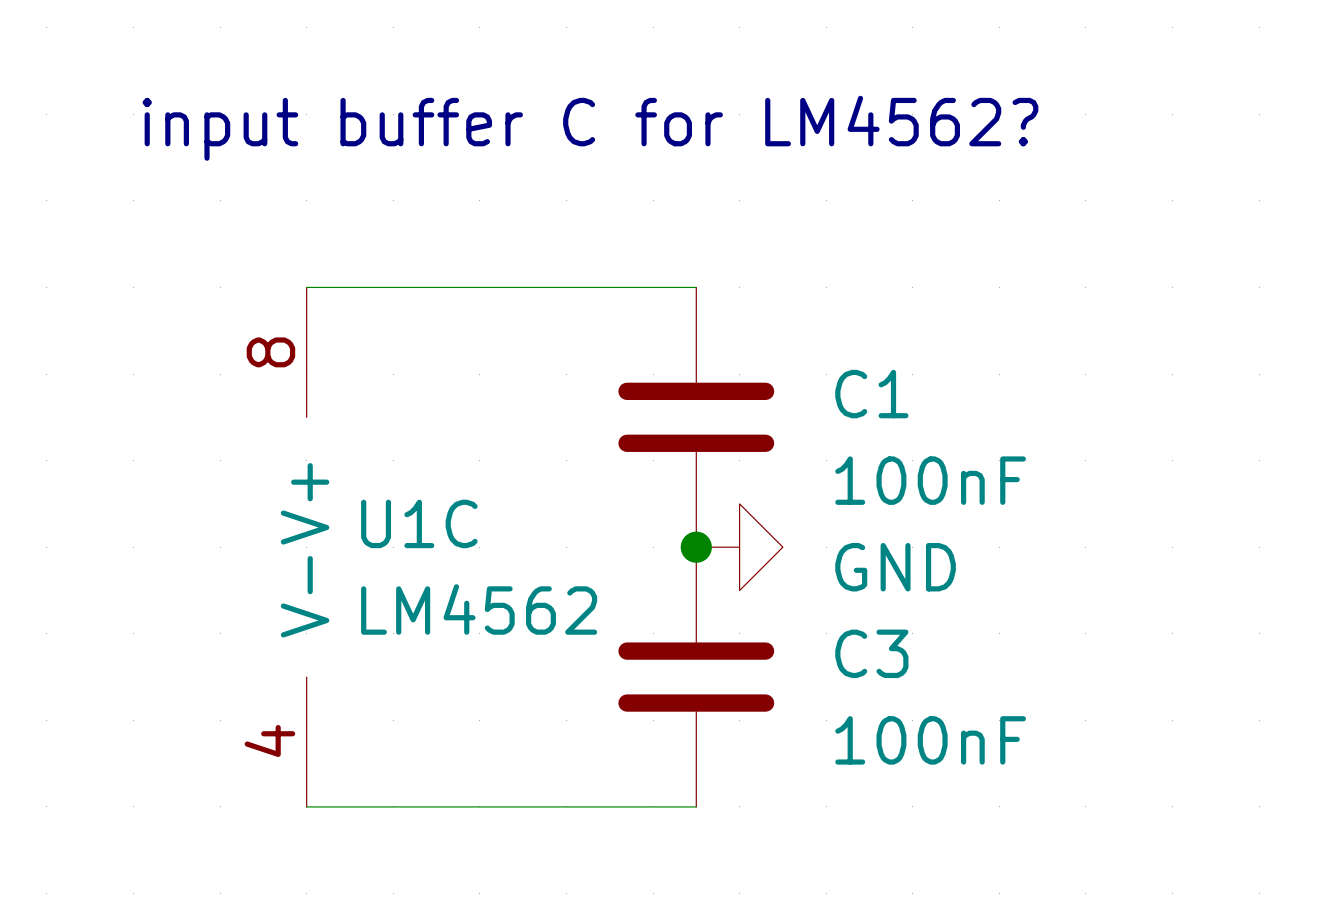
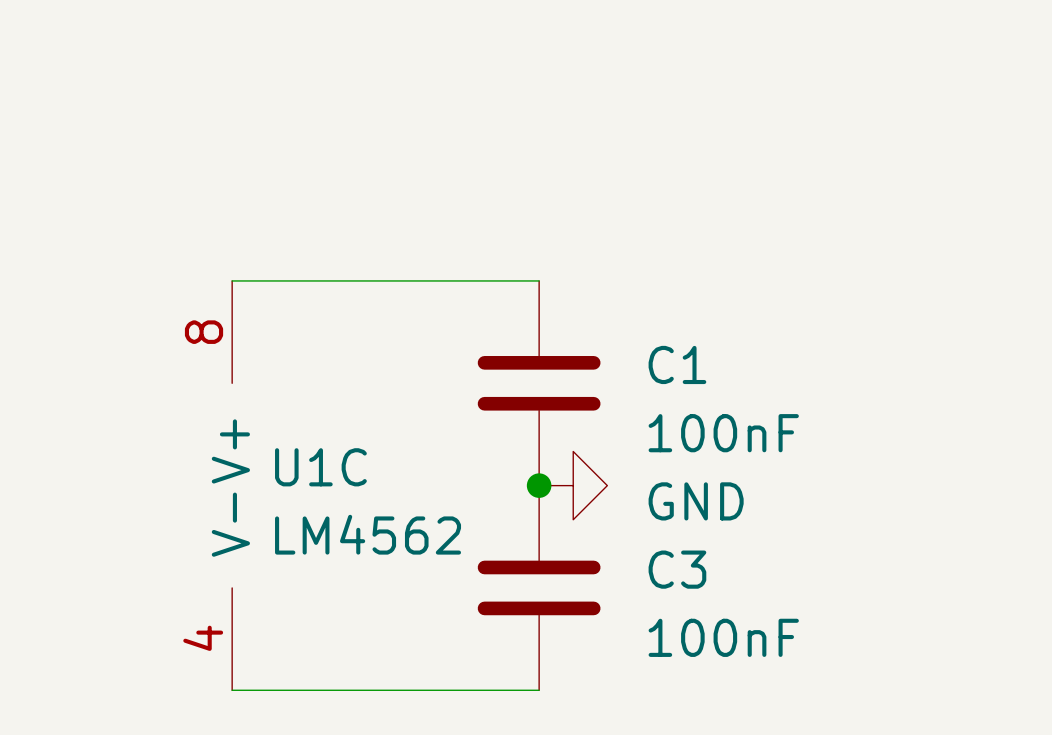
text: input buffer C for LM4562? (590, 128) -> none

